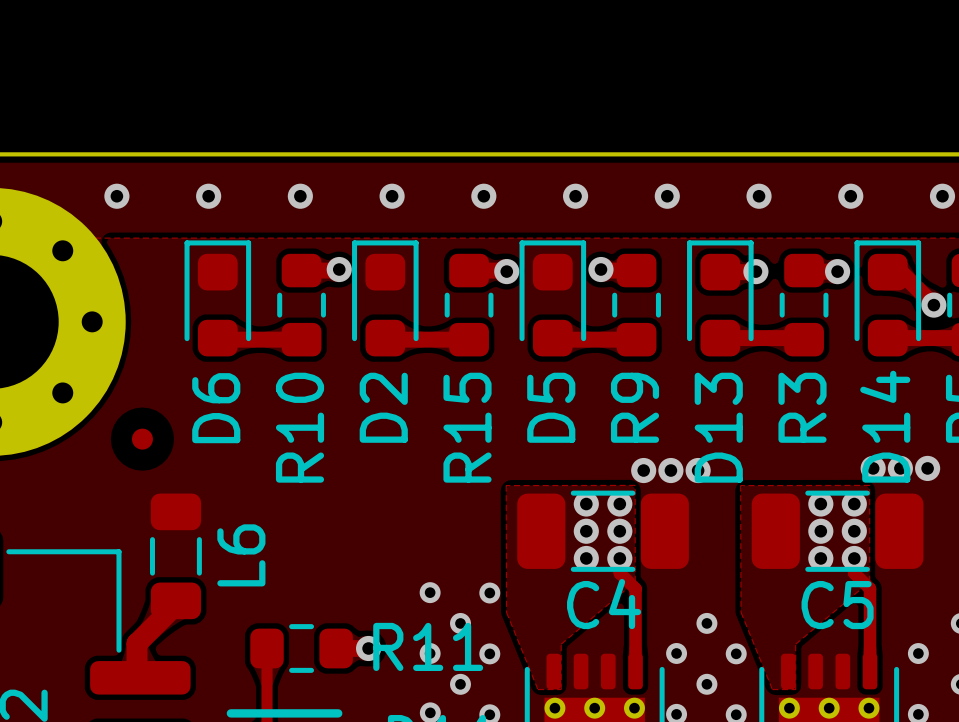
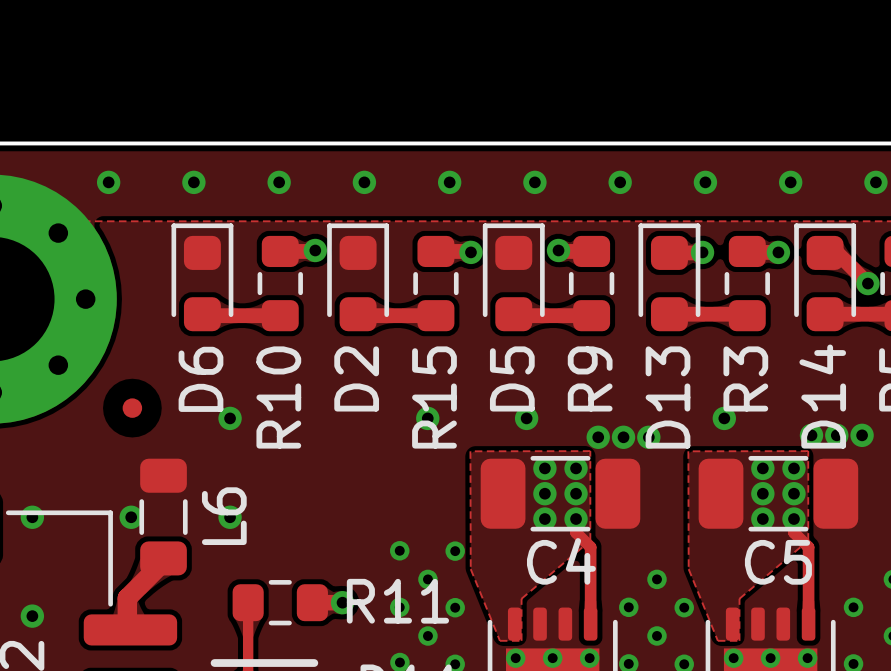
via: none -> (230, 418)
via: none -> (427, 418)
via: none -> (526, 418)
via: none -> (724, 418)
via: none -> (32, 517)
via: none -> (131, 517)
via: none -> (230, 517)
via: none -> (32, 616)

